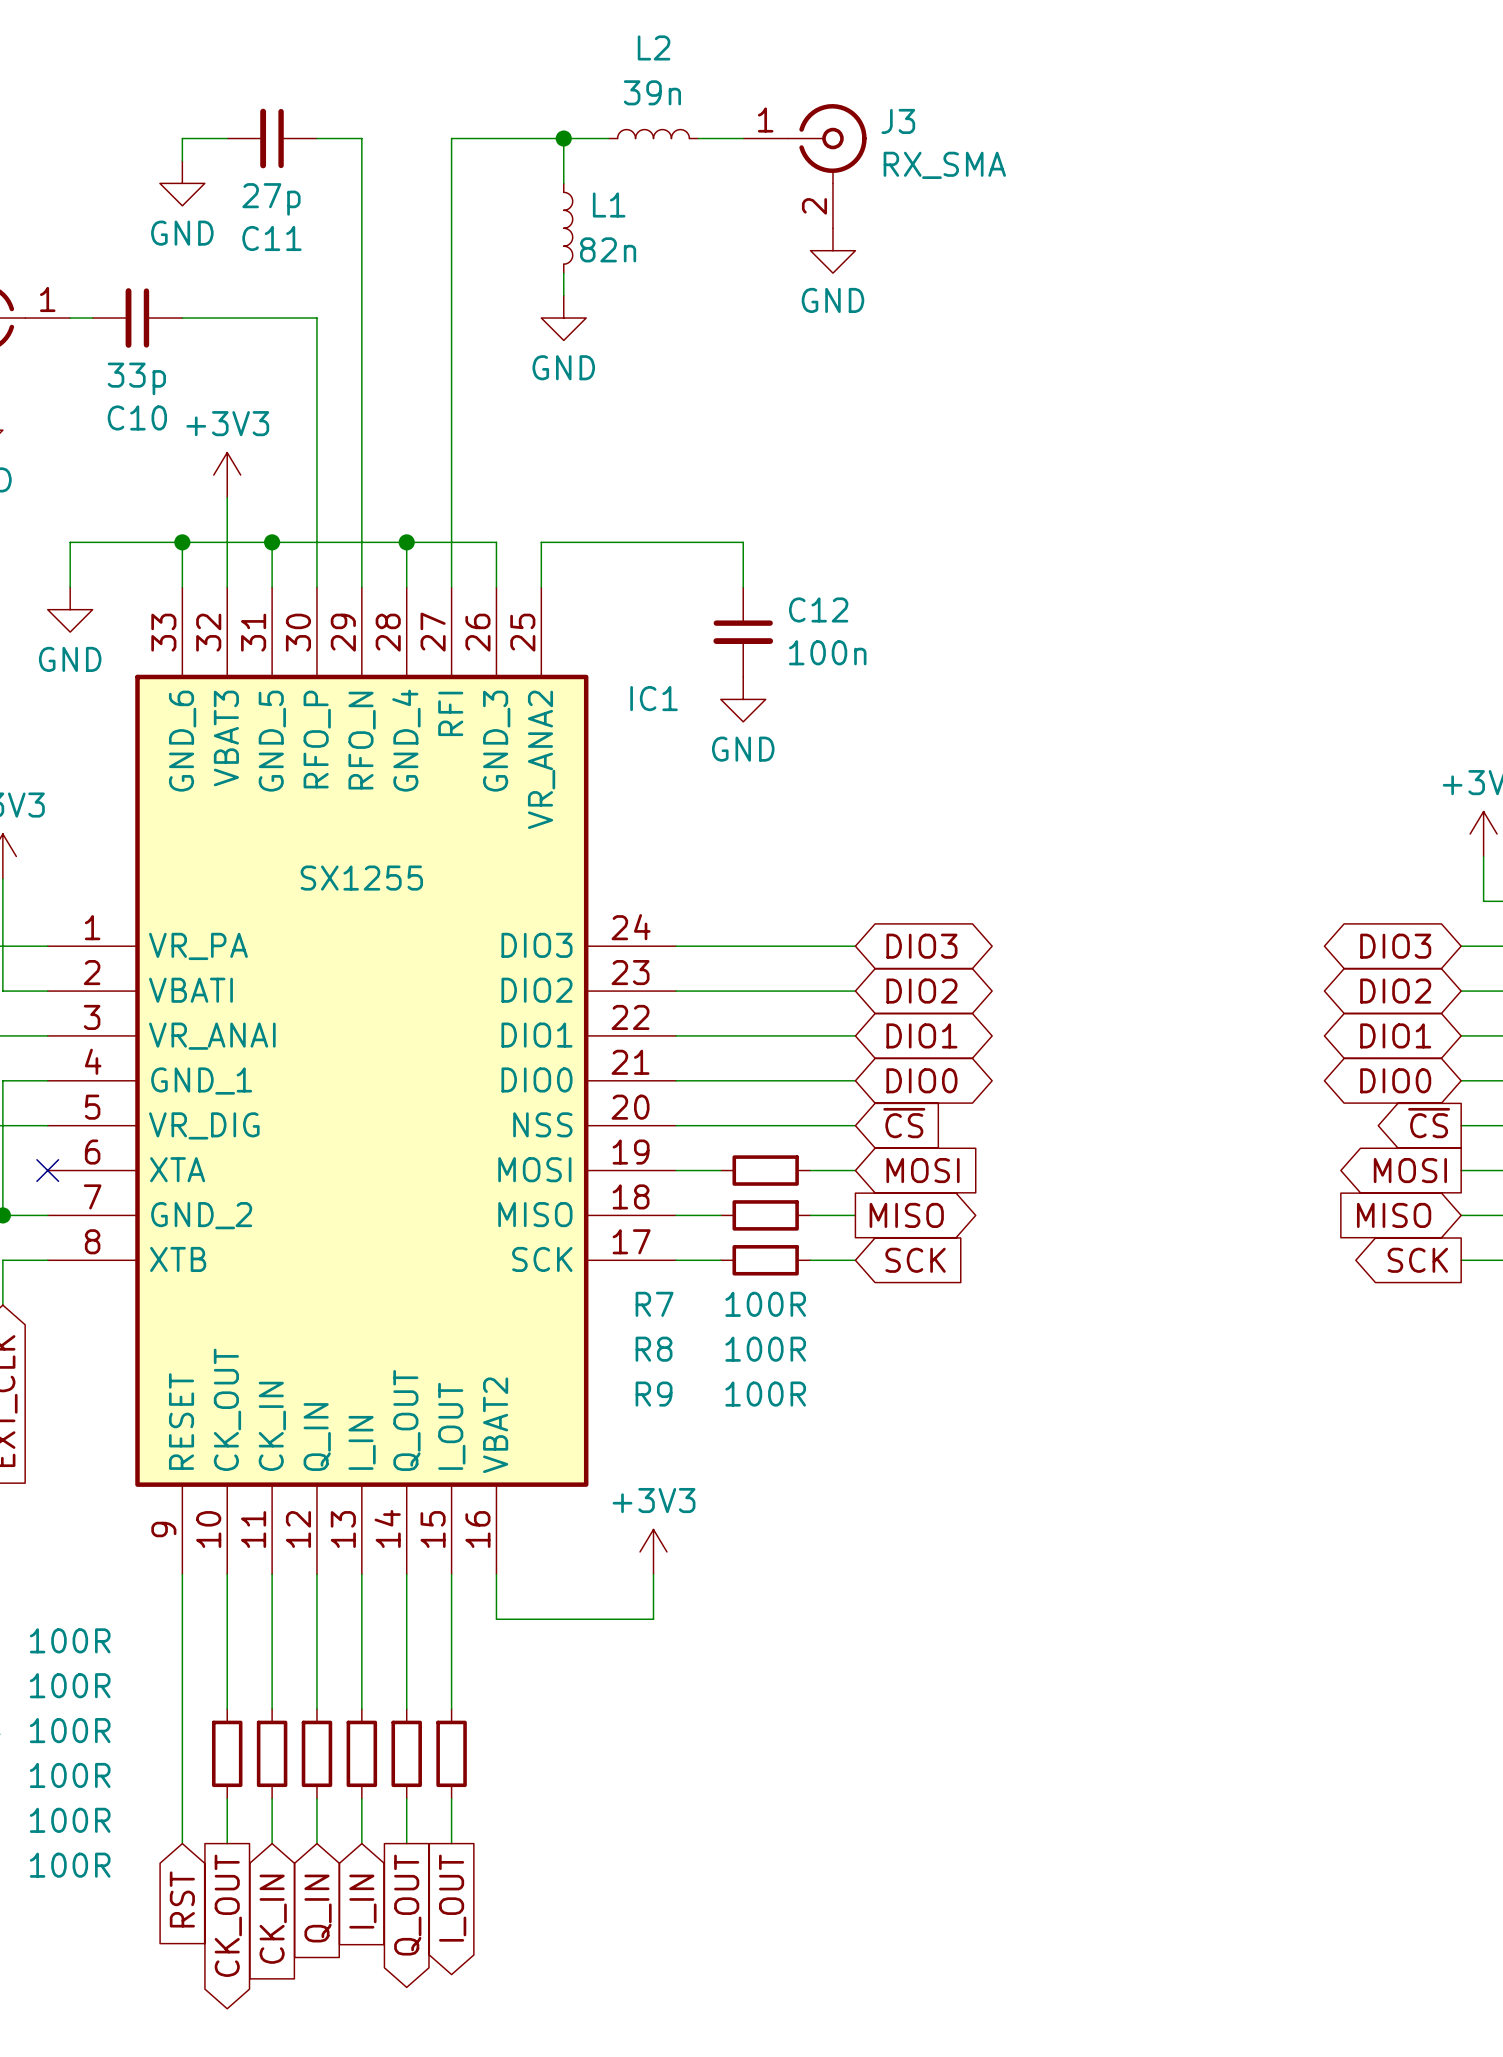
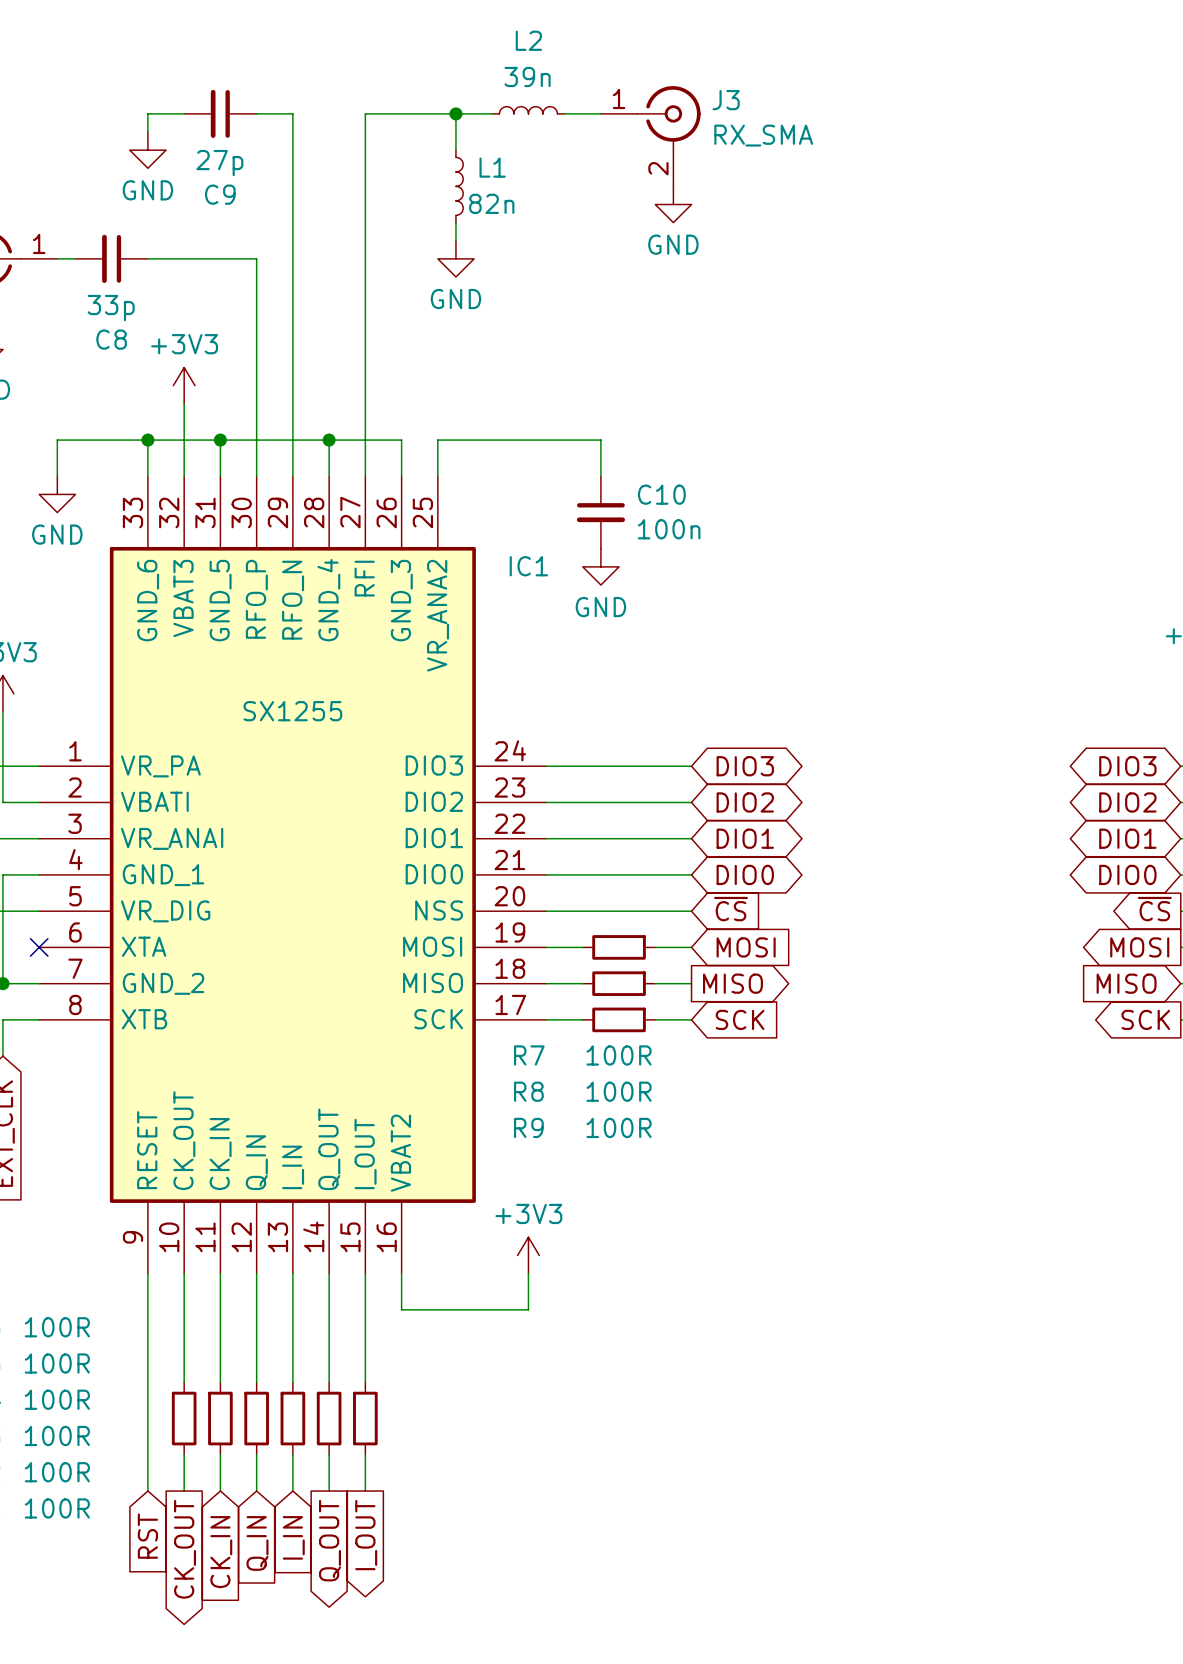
C11 name: C11 (271, 238) -> C9 (220, 194)
C10 name: C10 (137, 417) -> C8 (111, 339)
C12 name: C12 (818, 609) -> C10 (661, 494)

